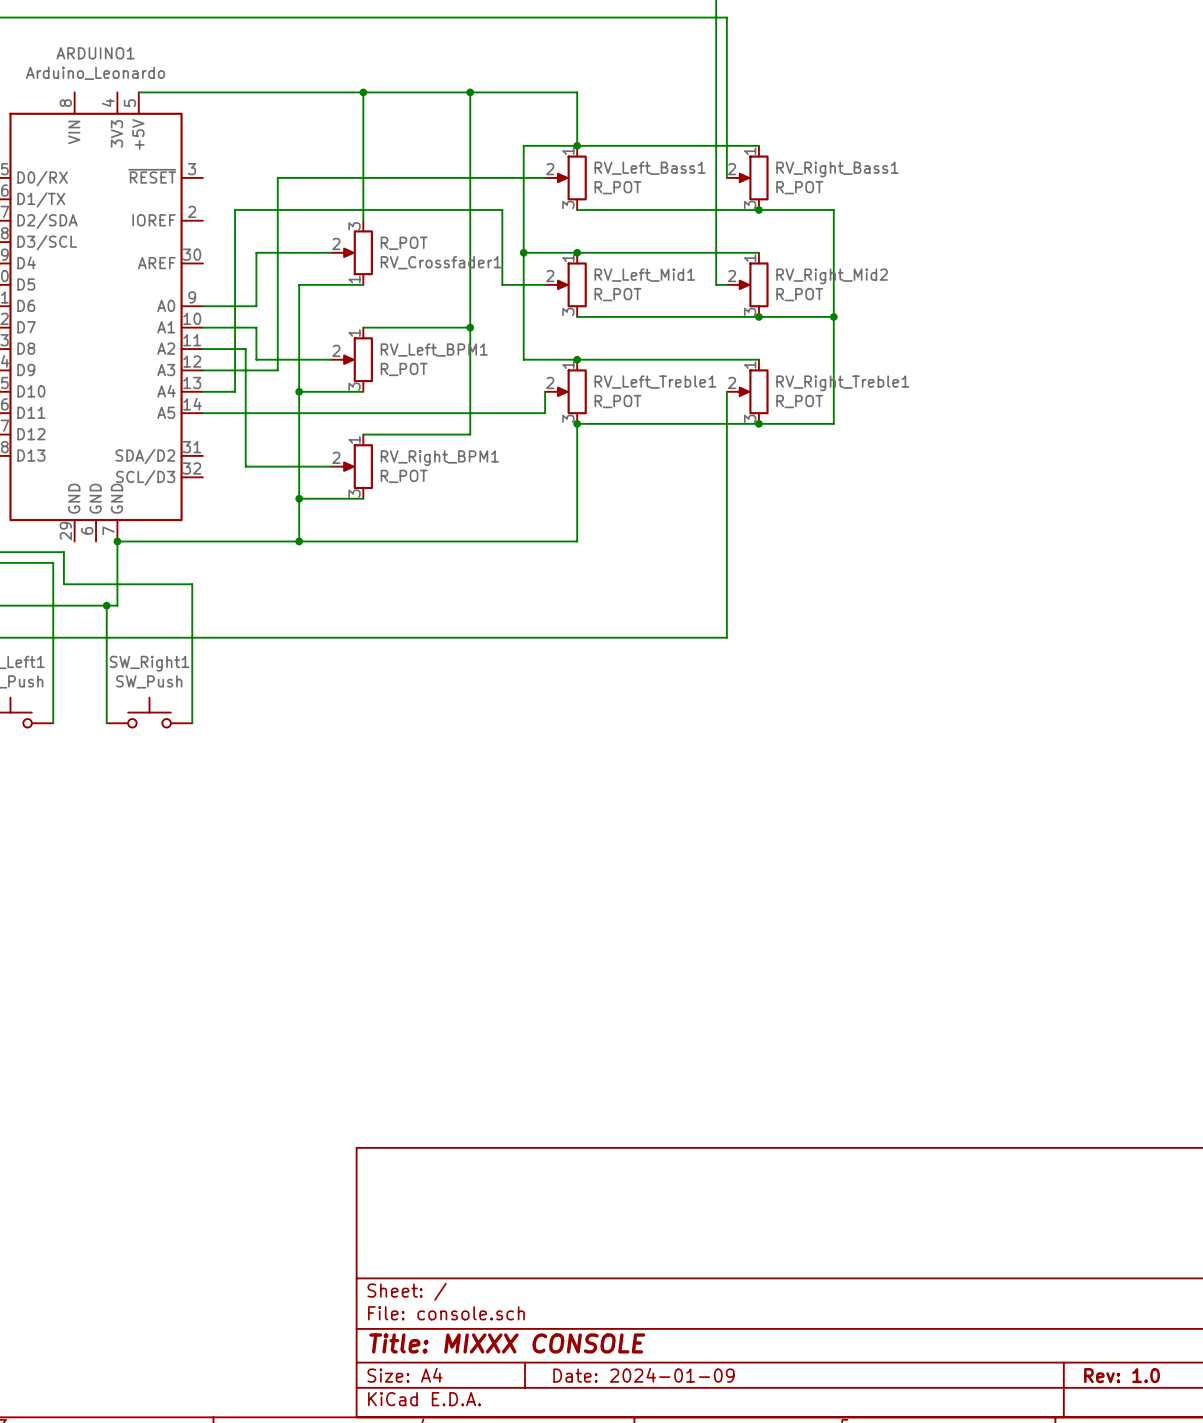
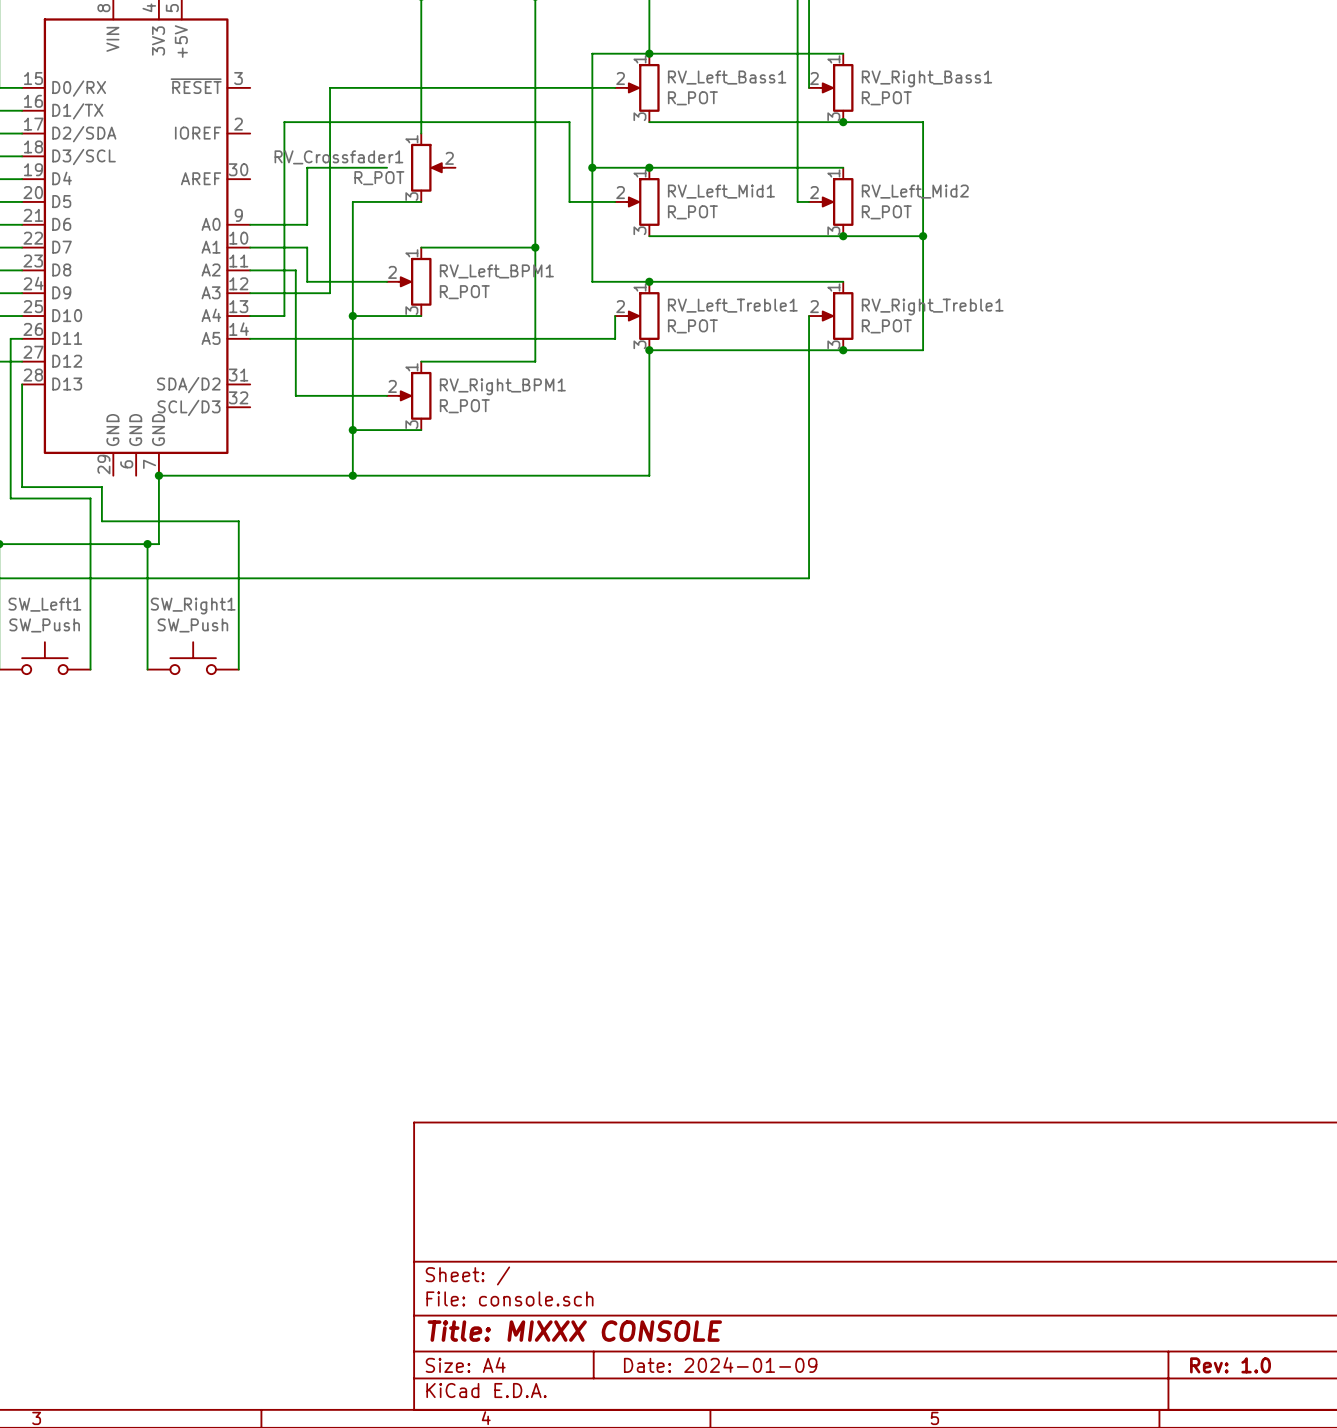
RV_Crossfader1 rotation: 0° (357, 252) -> 180° (427, 167)
RV_Right_Mid2 name: RV_Right_Mid2 (832, 276) -> RV_Left_Mid2 (915, 191)

